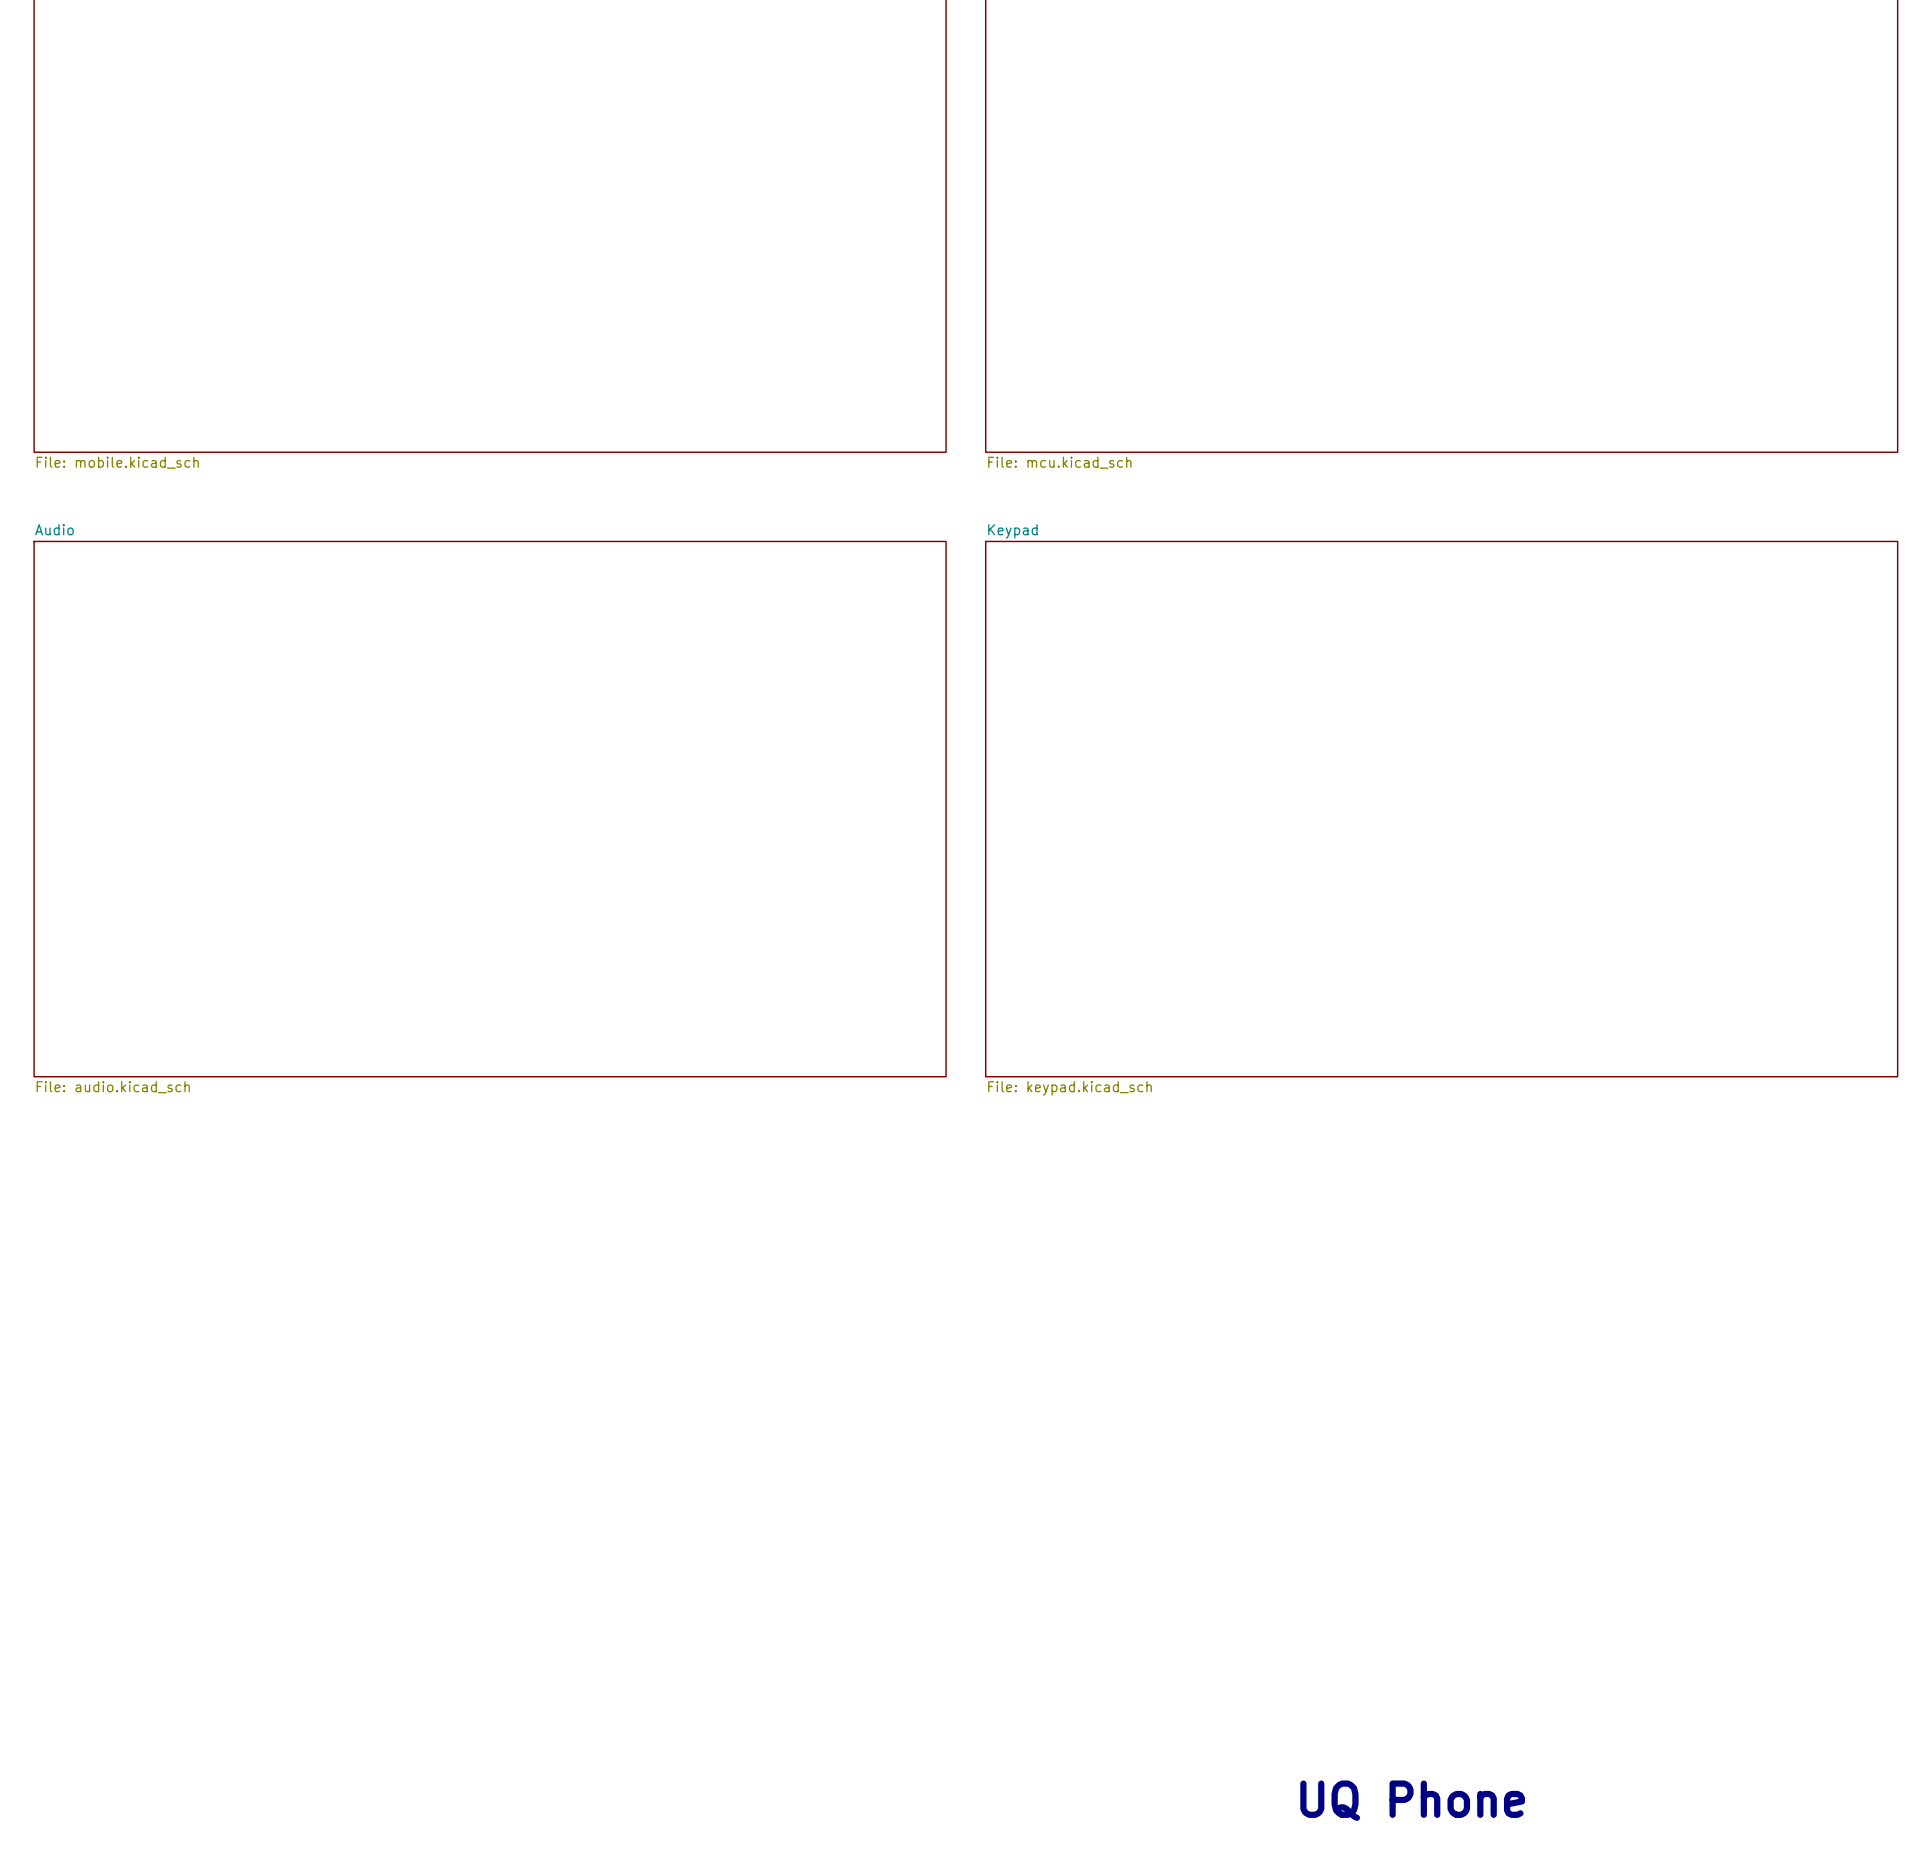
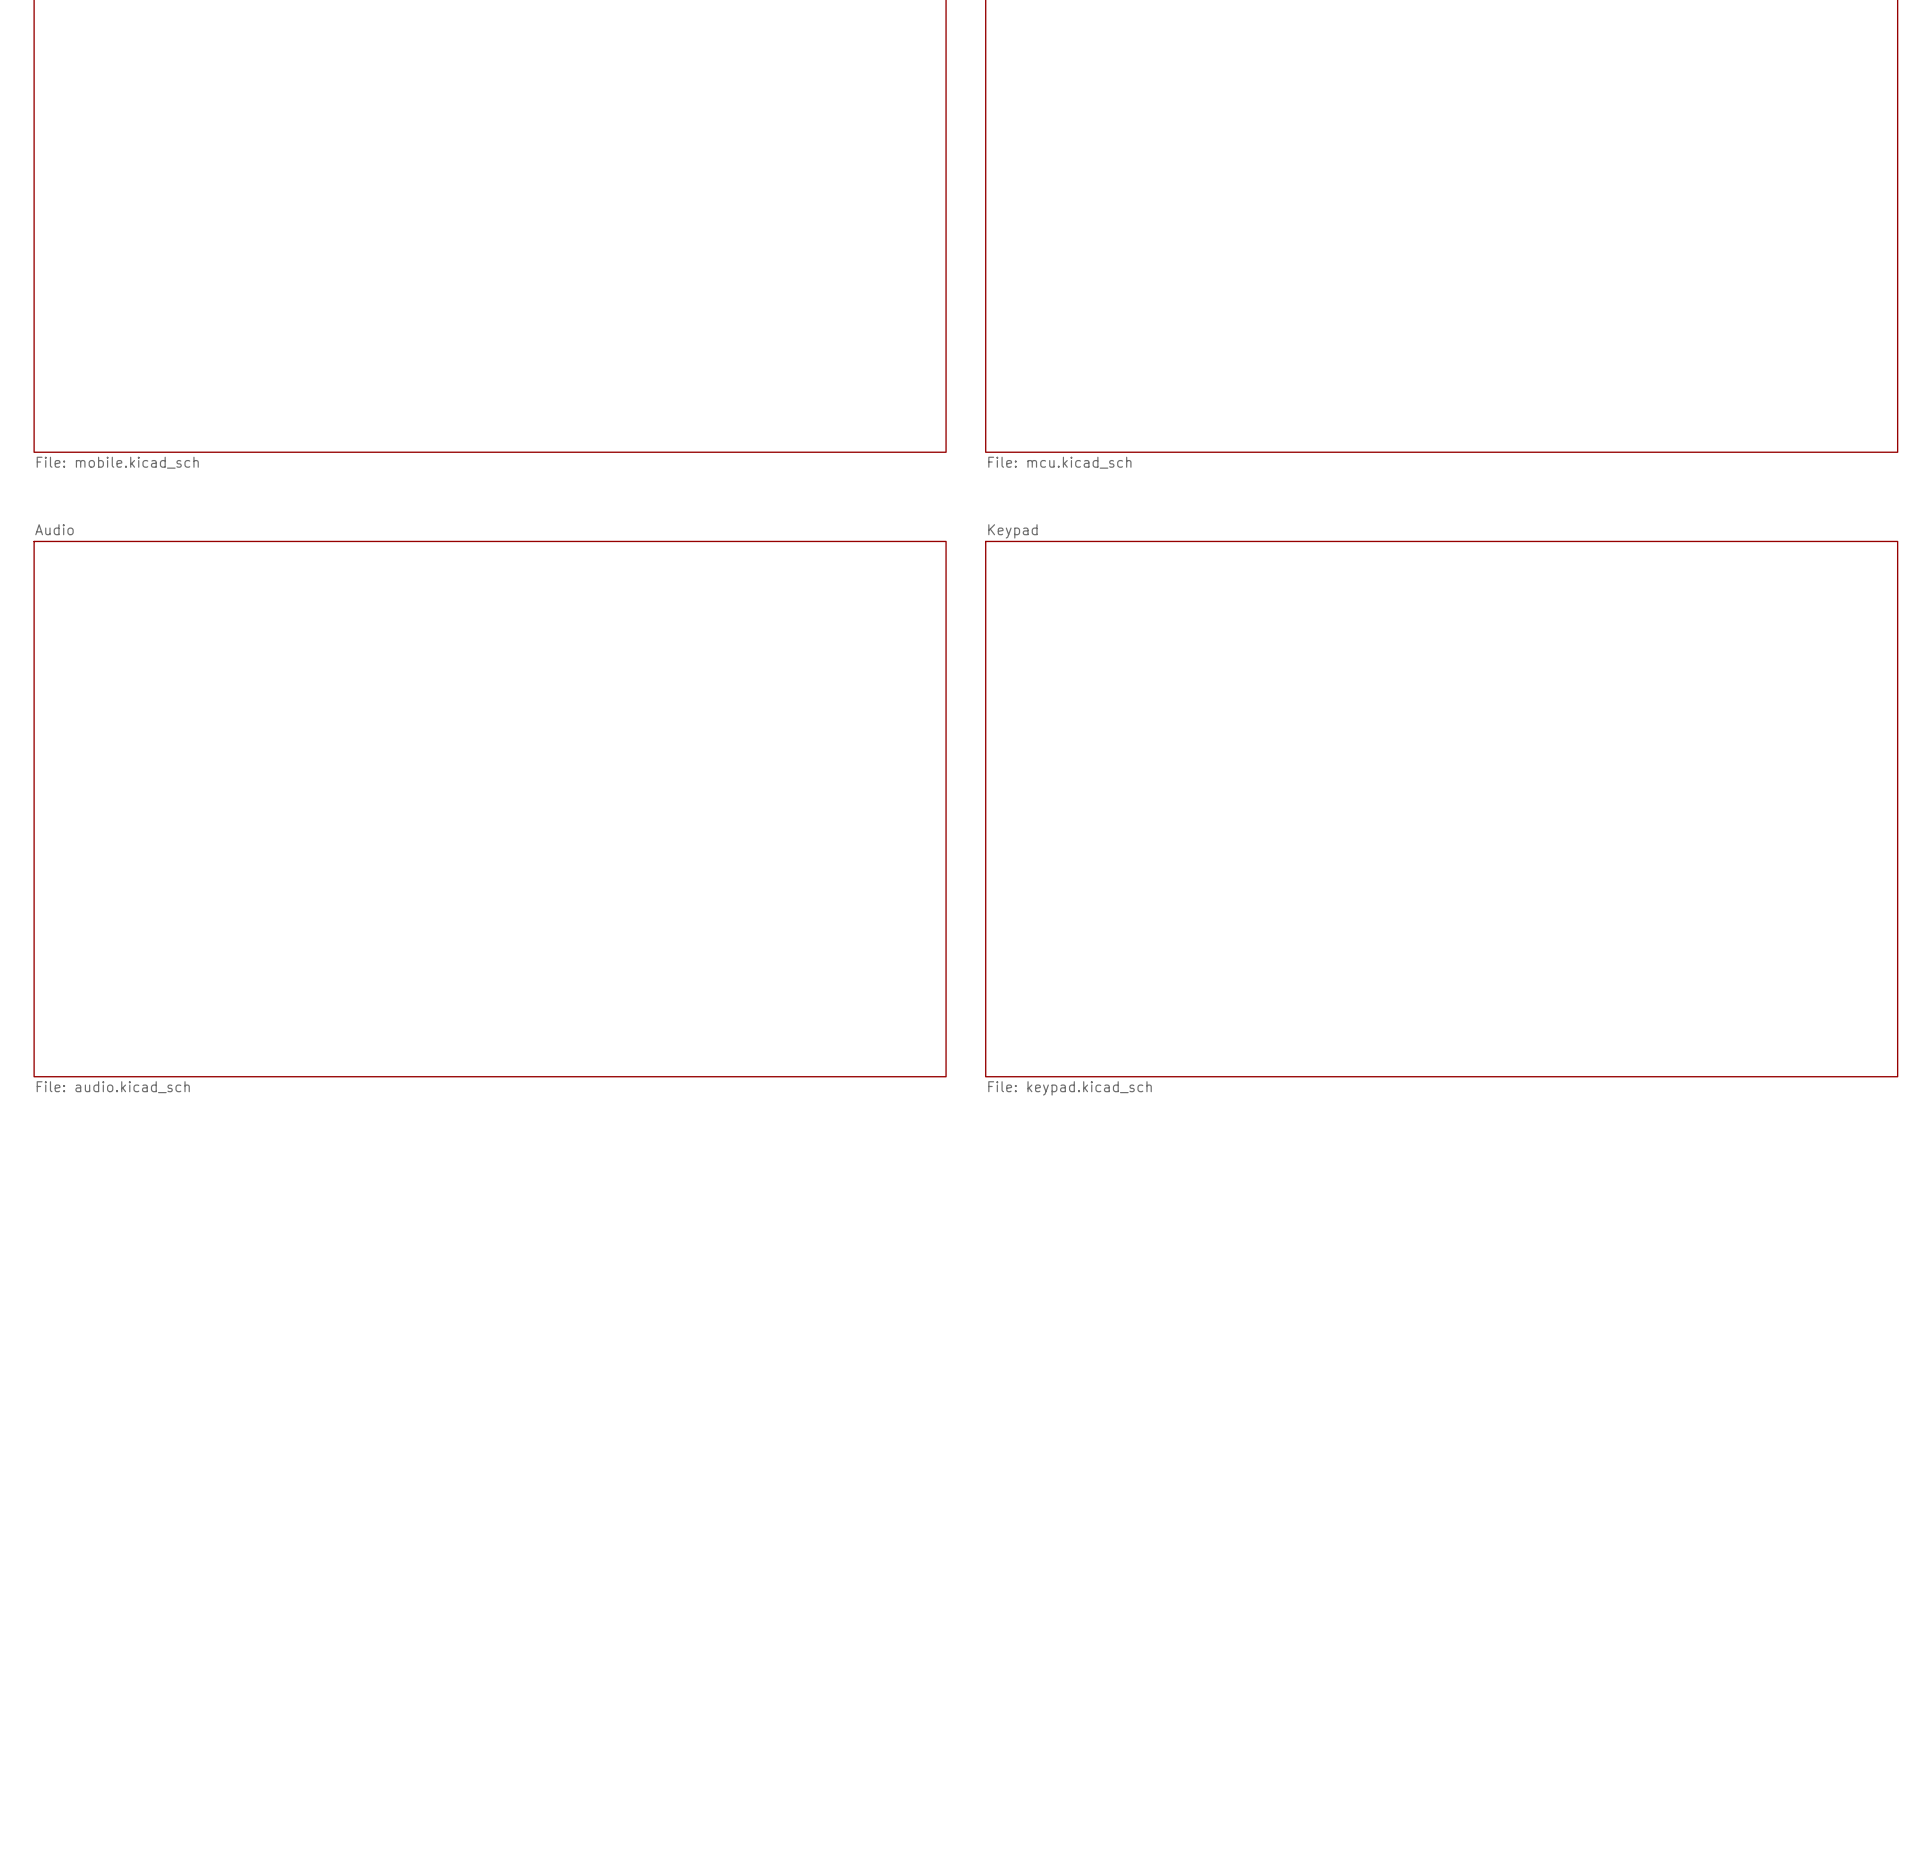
text: UQ Phone (1412, 1800) -> none

